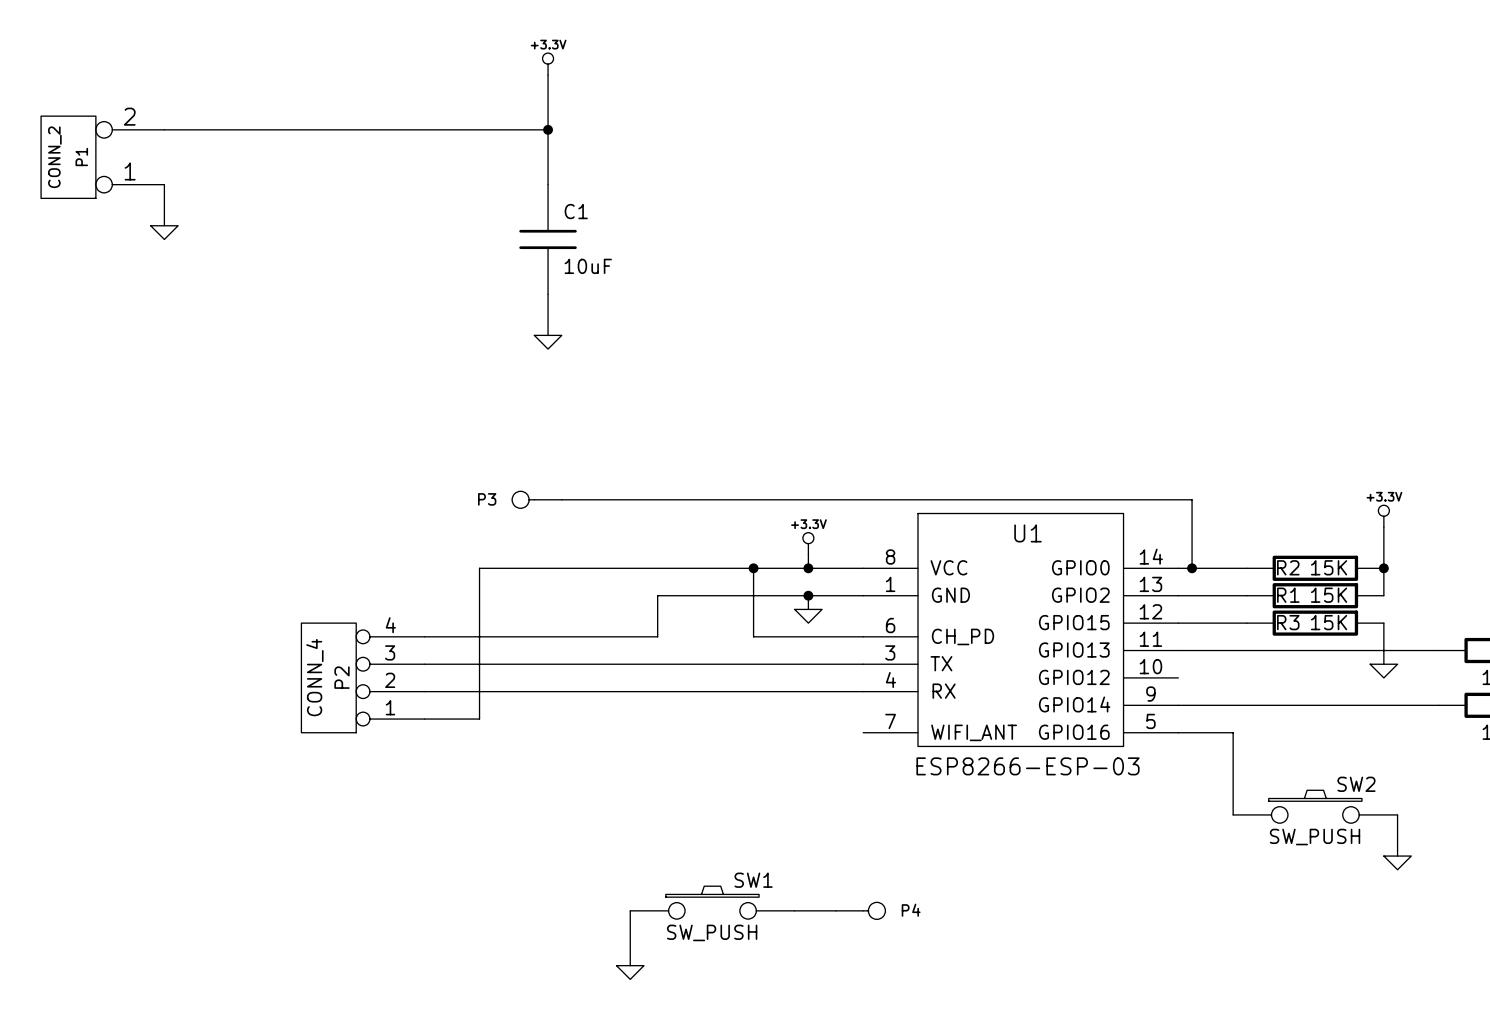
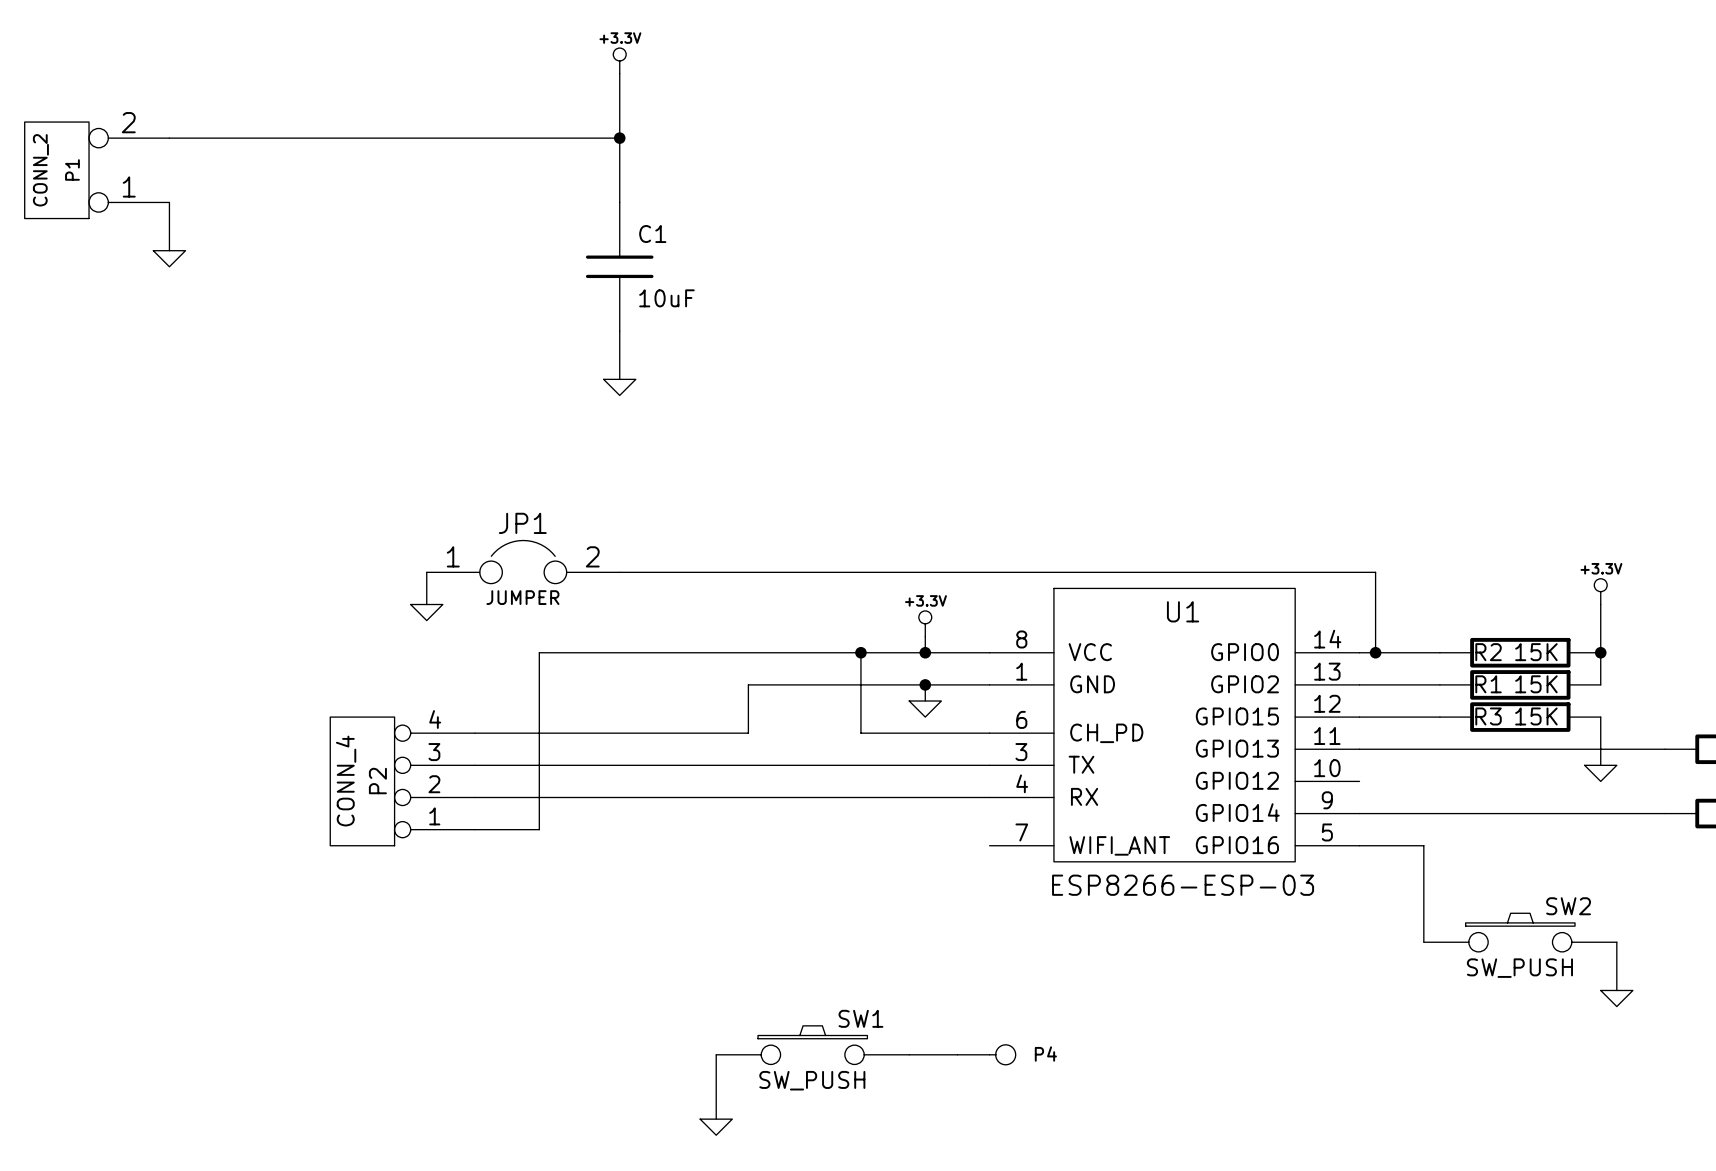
JP1: none -> JUMPER (523, 562)
wire: none -> (426, 572) (426, 604)
P3: (536, 499) -> none
power symbol: none -> (426, 612)

